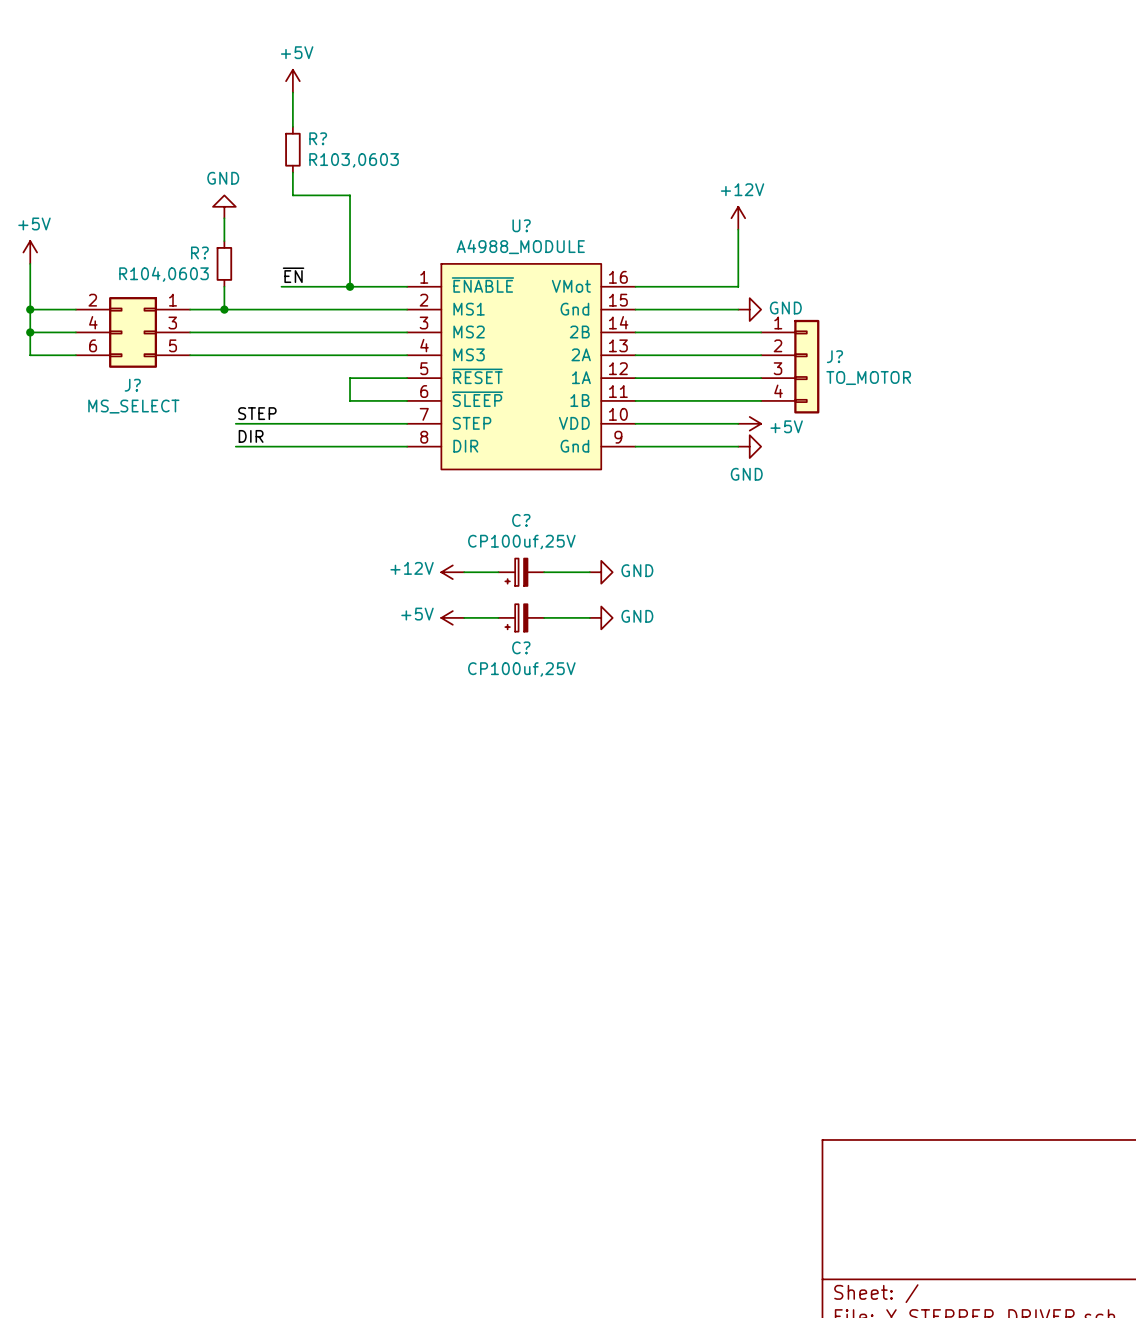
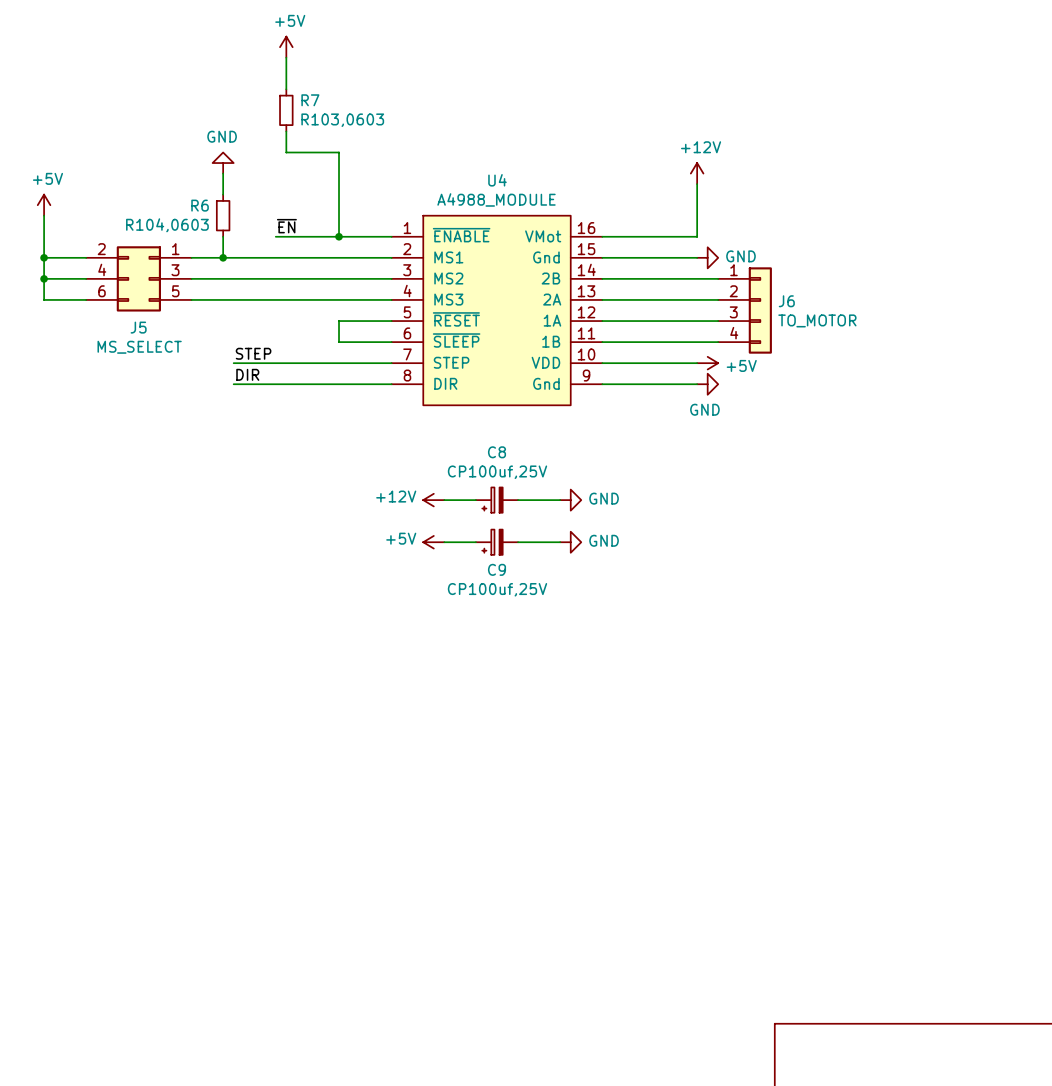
R? name: R? (318, 138) -> R7 (310, 100)
U? name: U? (521, 225) -> U4 (497, 180)
R? name: R? (199, 252) -> R6 (200, 205)
J? name: J? (834, 356) -> J6 (786, 301)
J? name: J? (132, 385) -> J5 (138, 327)
C? name: C? (521, 520) -> C8 (497, 452)
C? name: C? (521, 647) -> C9 (497, 569)

